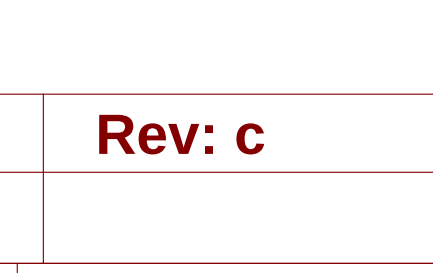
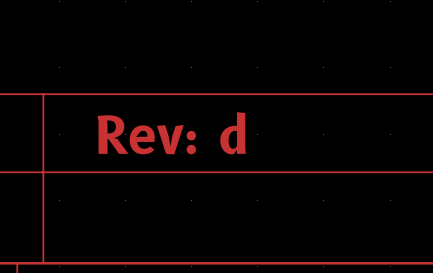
title block: Rev: c (181, 134) -> Rev: d (171, 133)

